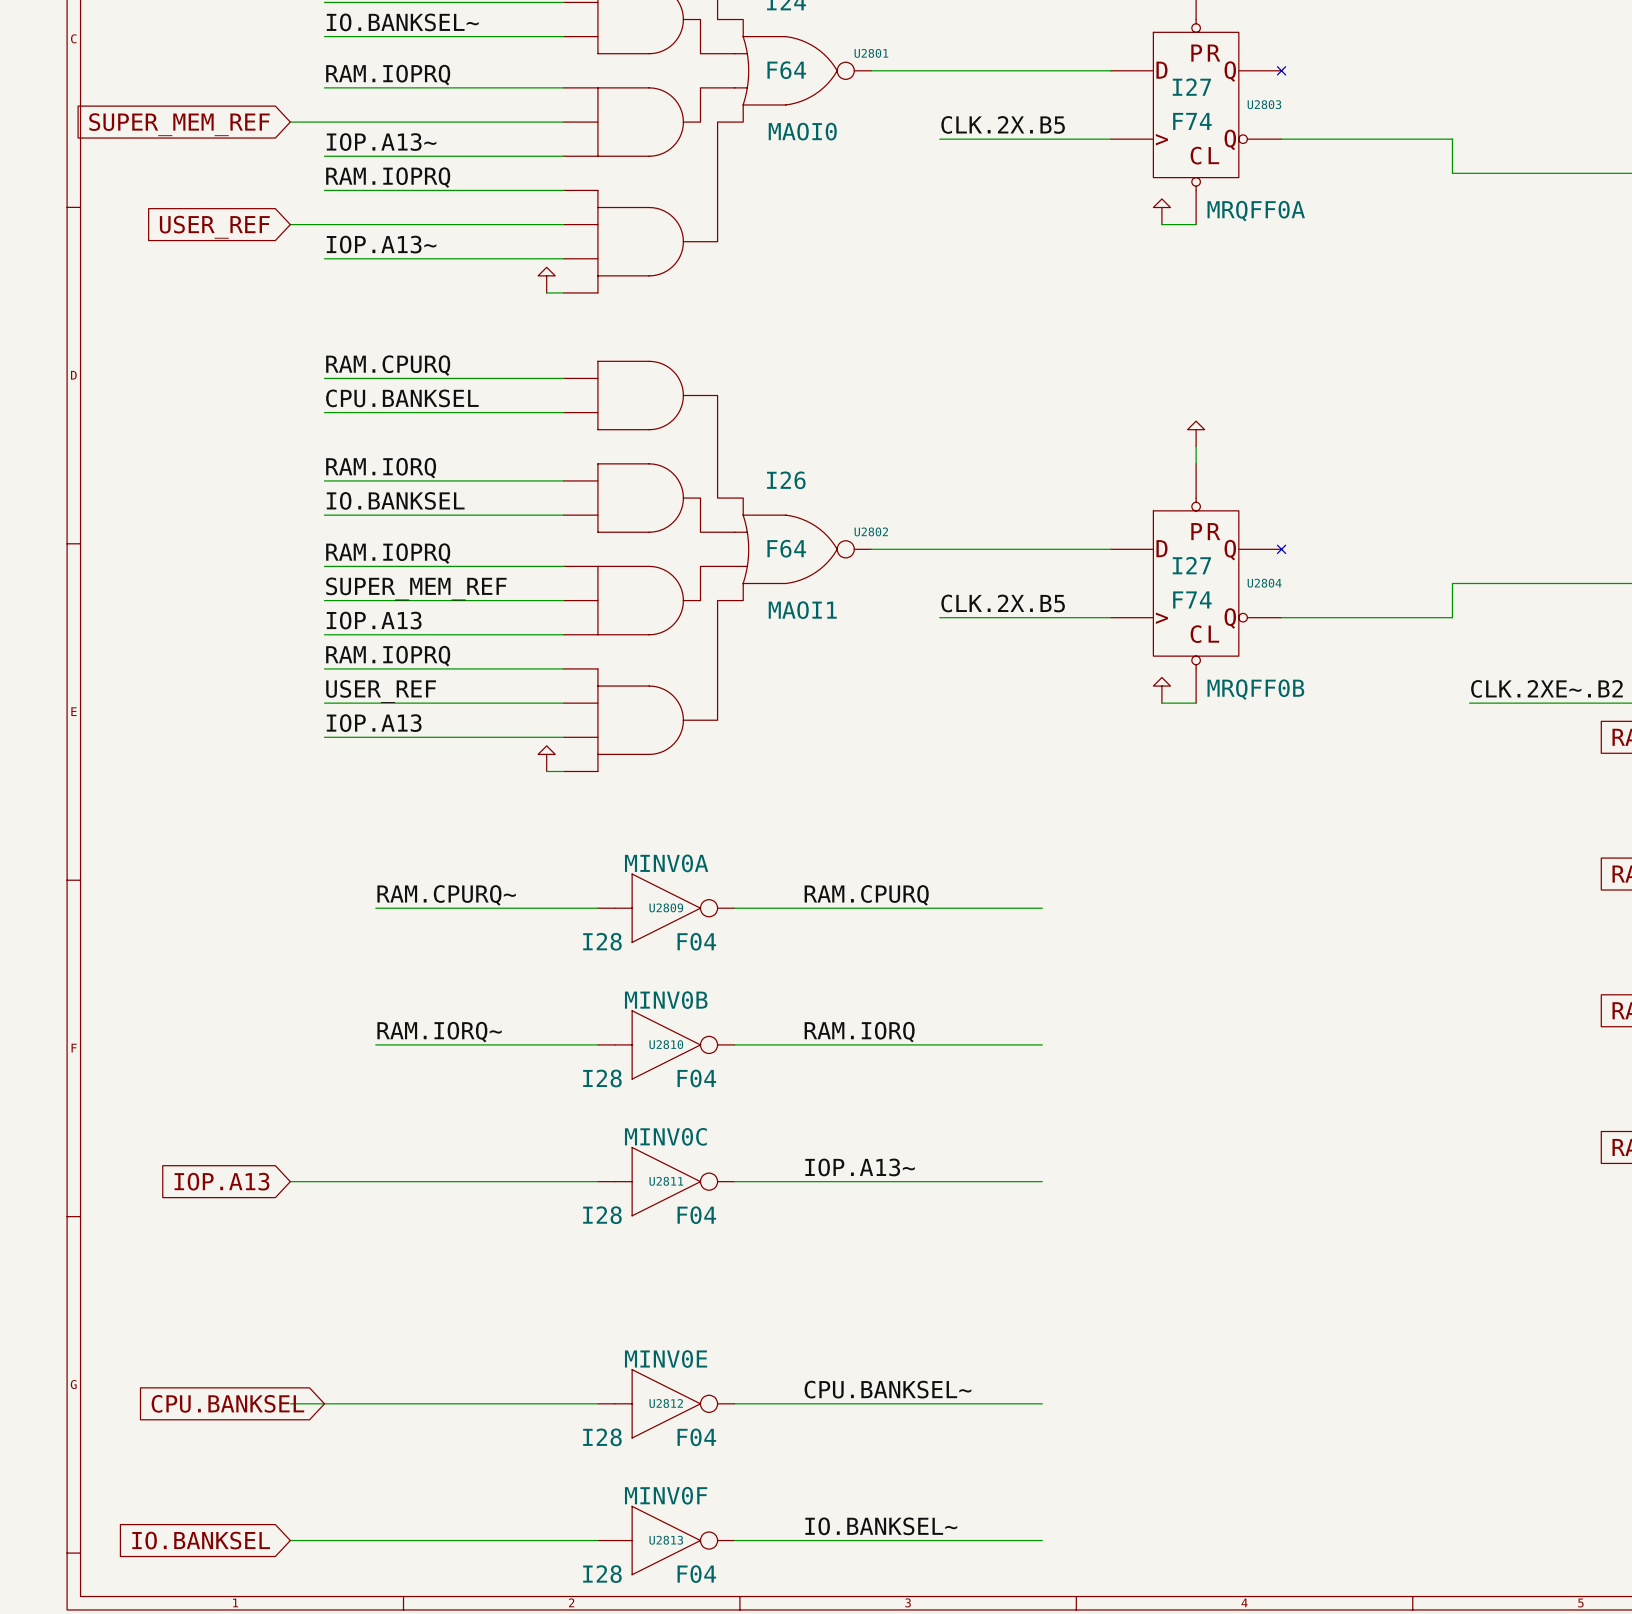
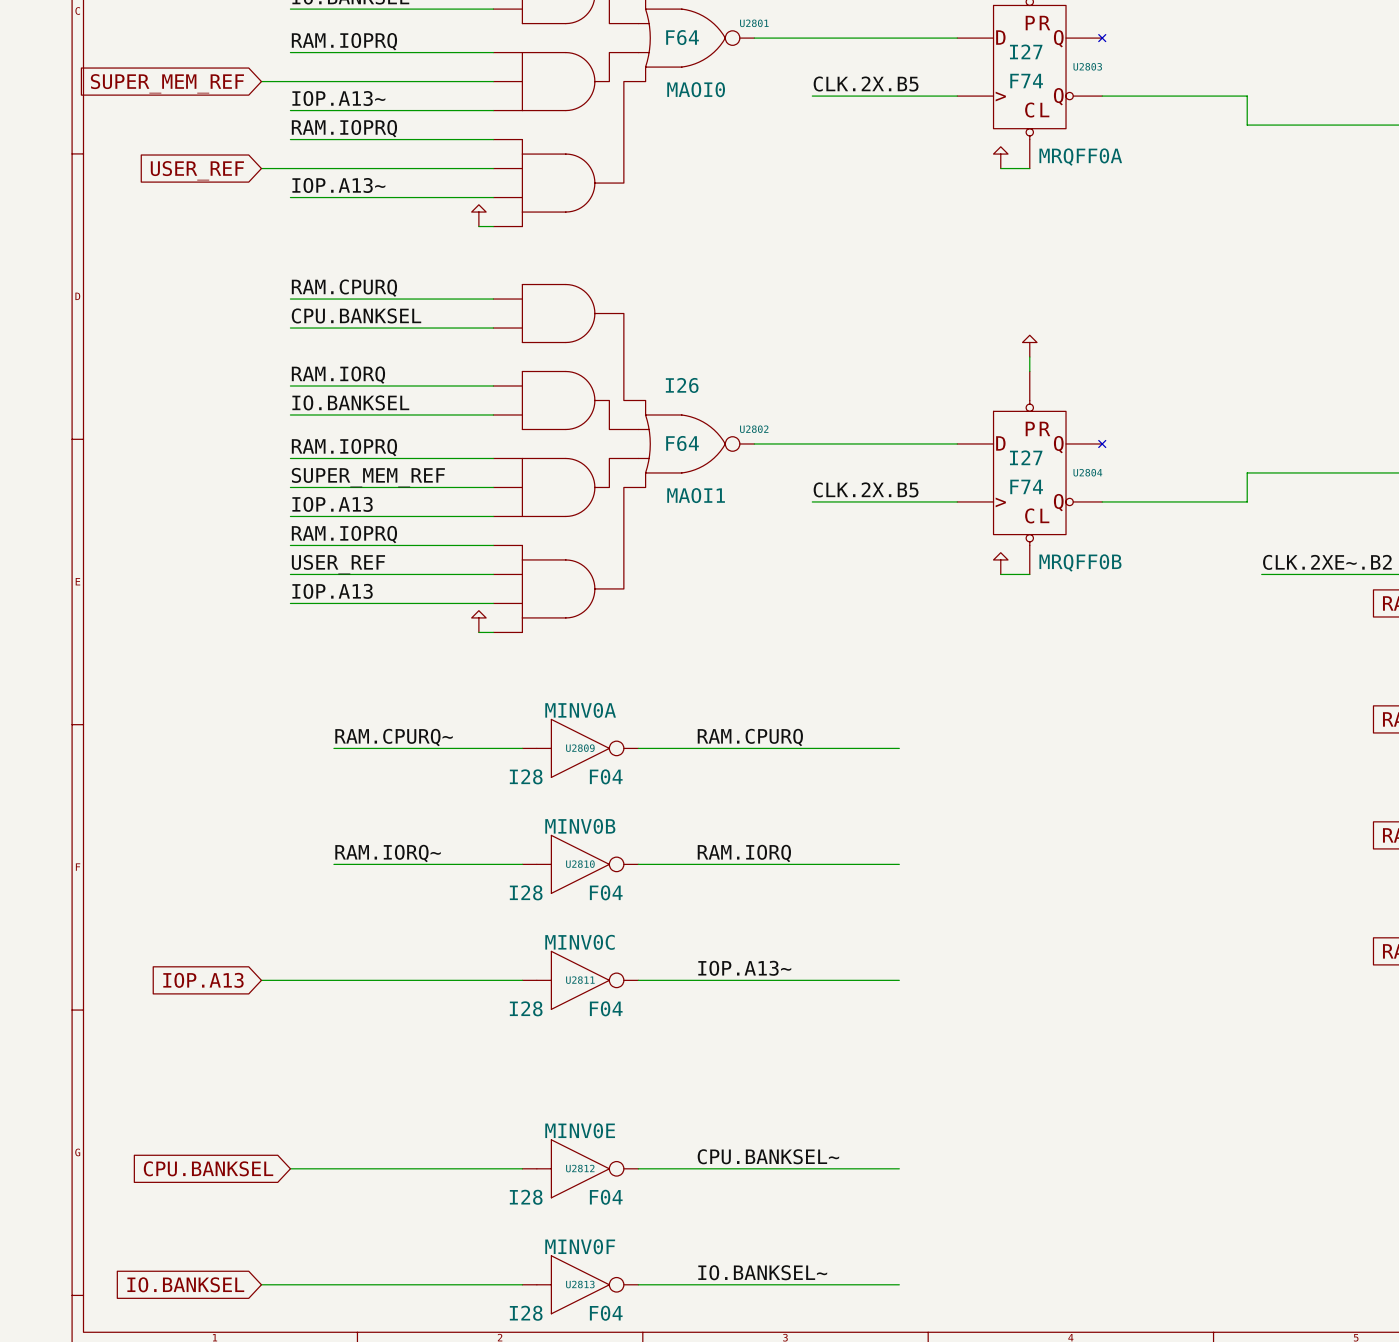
wire: (290, 1403) (324, 1403) -> none

